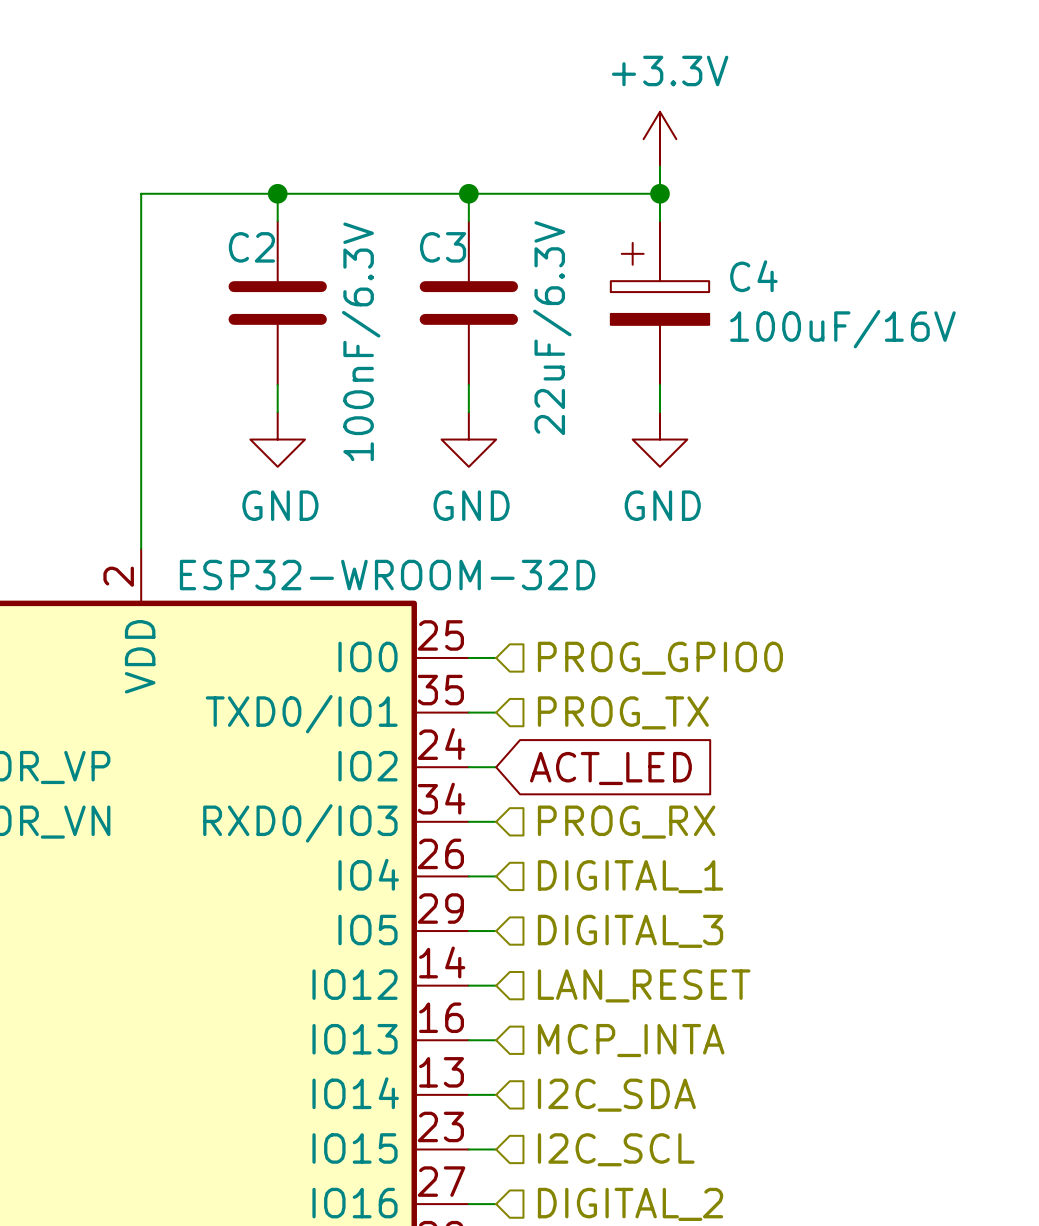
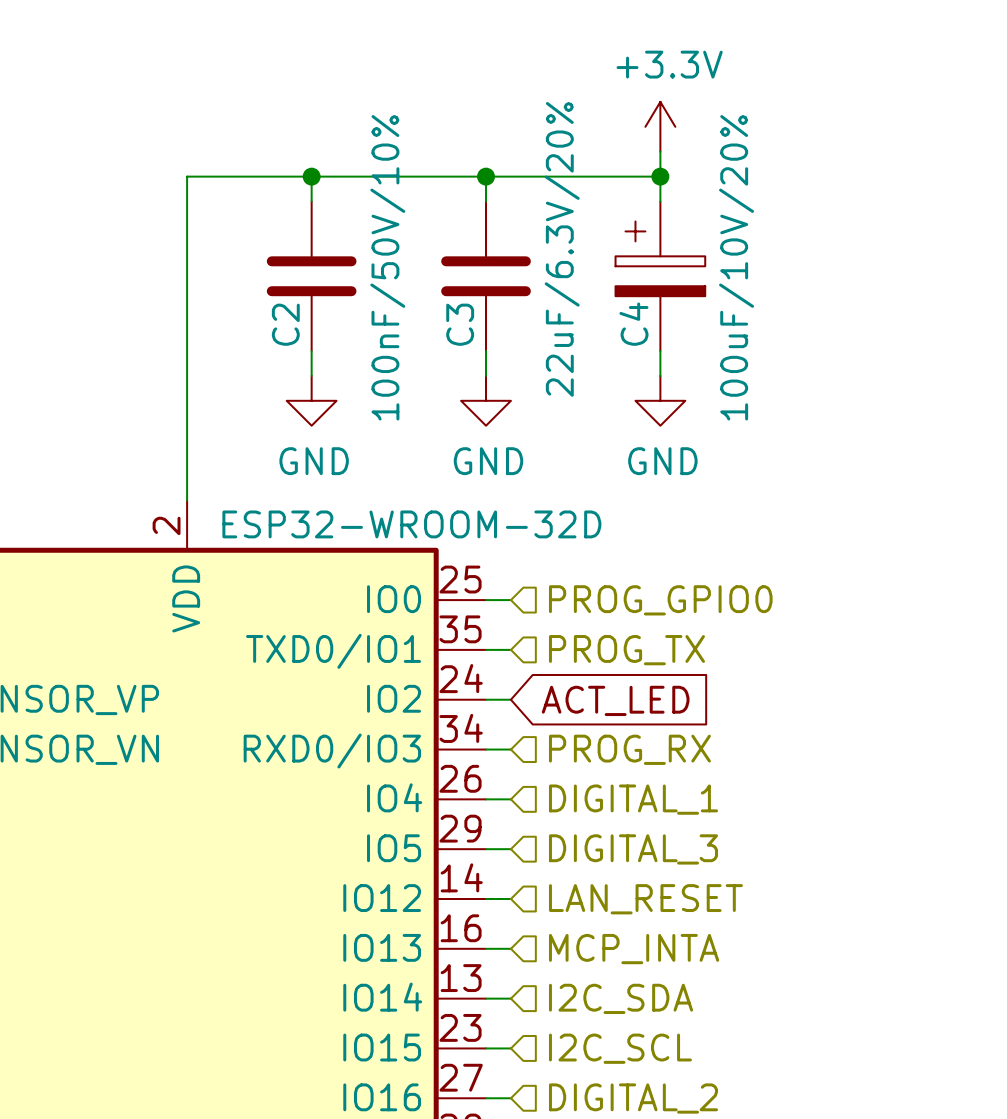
C2 name rotation: 0° (251, 247) -> 90° counterclockwise (285, 324)
C2 name position: C2 (251, 247) -> C2 (285, 324)
C3 name rotation: 0° (443, 247) -> 90° counterclockwise (460, 324)
C3 name position: C3 (443, 247) -> C3 (460, 324)
C4 name rotation: 0° (753, 276) -> 90° counterclockwise (633, 324)
C4 name position: C4 (753, 276) -> C4 (633, 324)
C3 value: 22uF/6.3V (552, 328) -> 22uF/6.3V/20% (562, 249)
C4 value: 100uF/16V (842, 329) -> 100uF/10V/20% (736, 267)
C2 value: 100nF/6.3V (361, 341) -> 100nF/50V/10% (387, 267)

